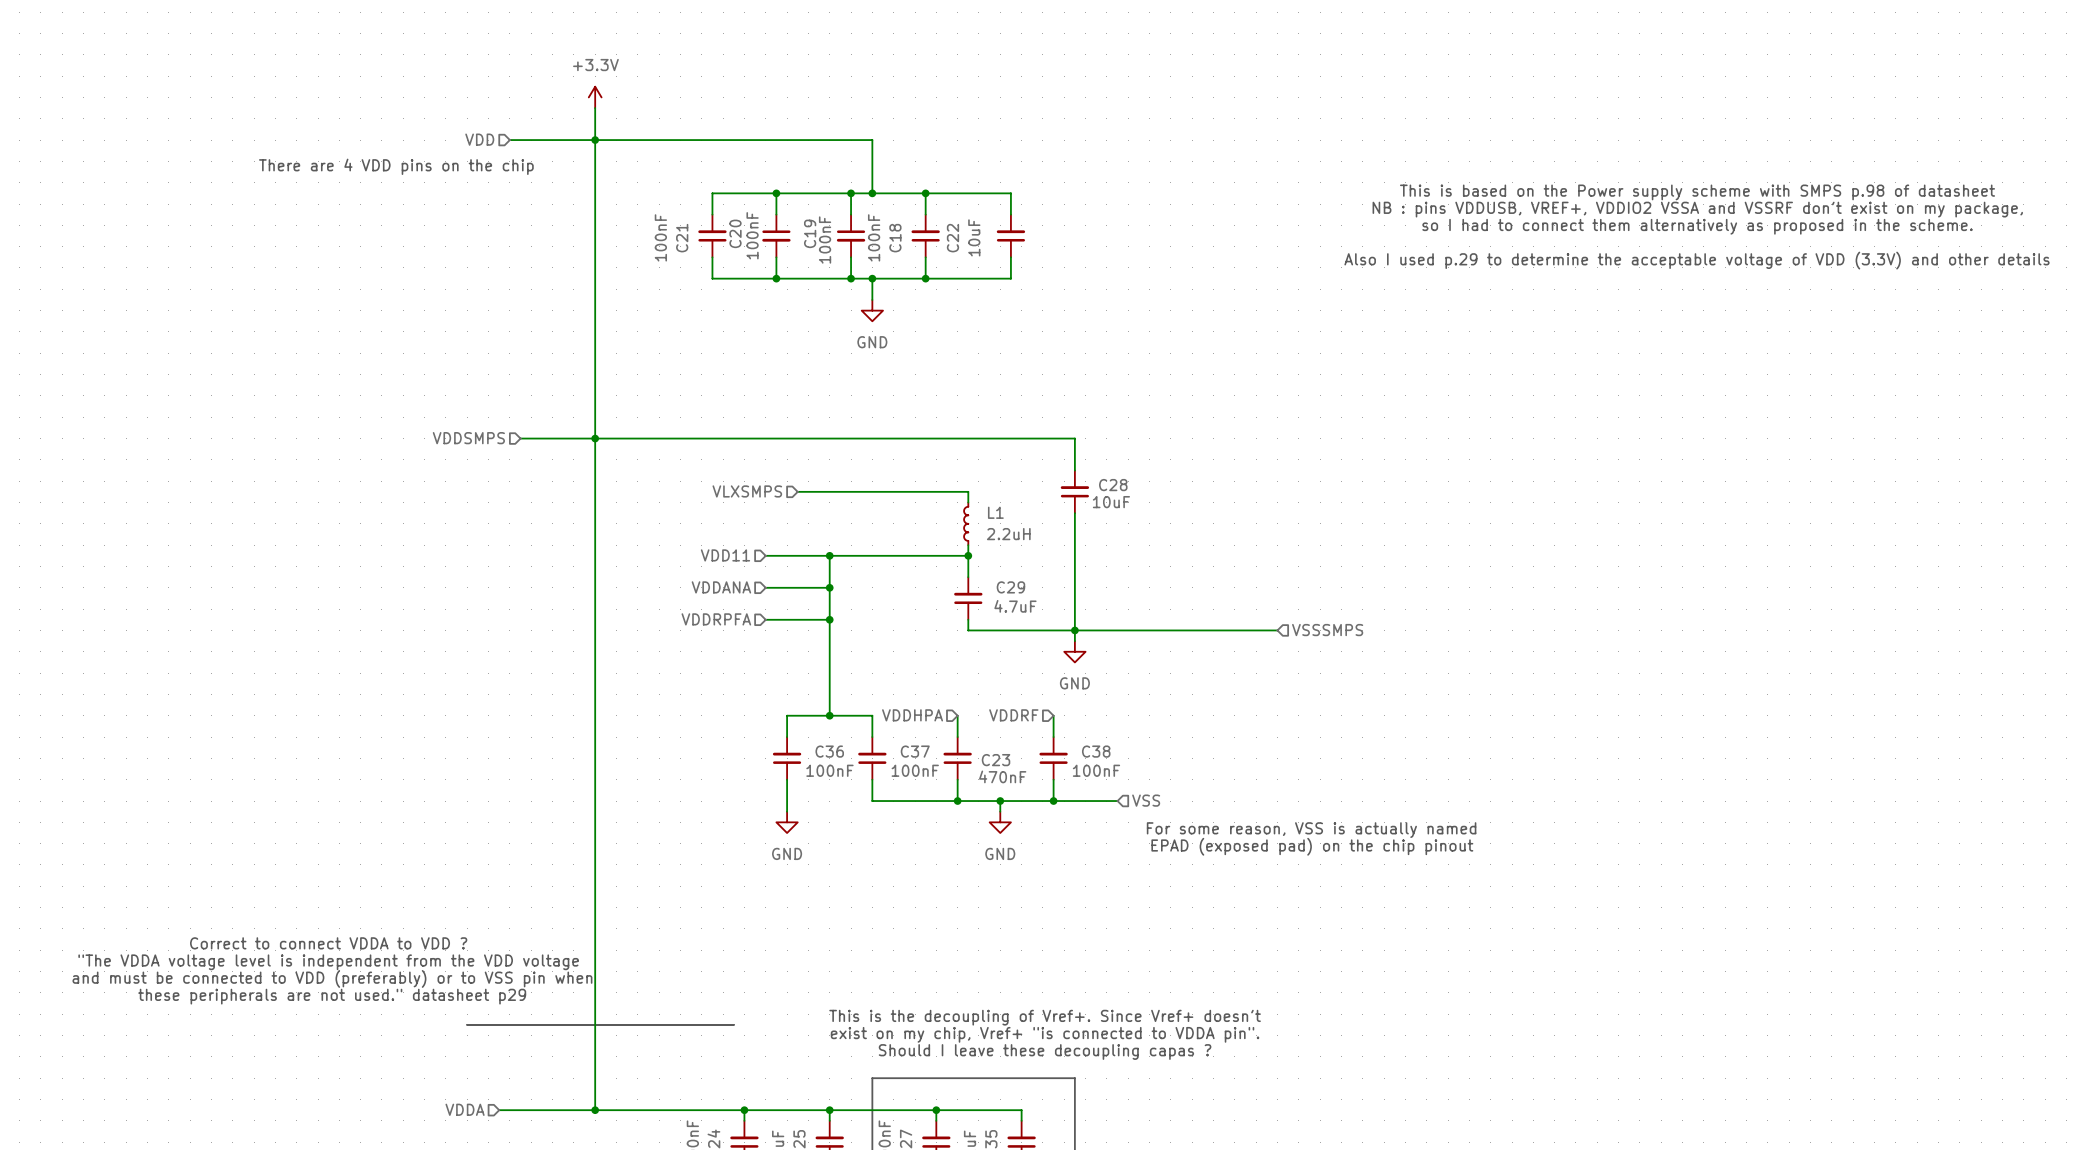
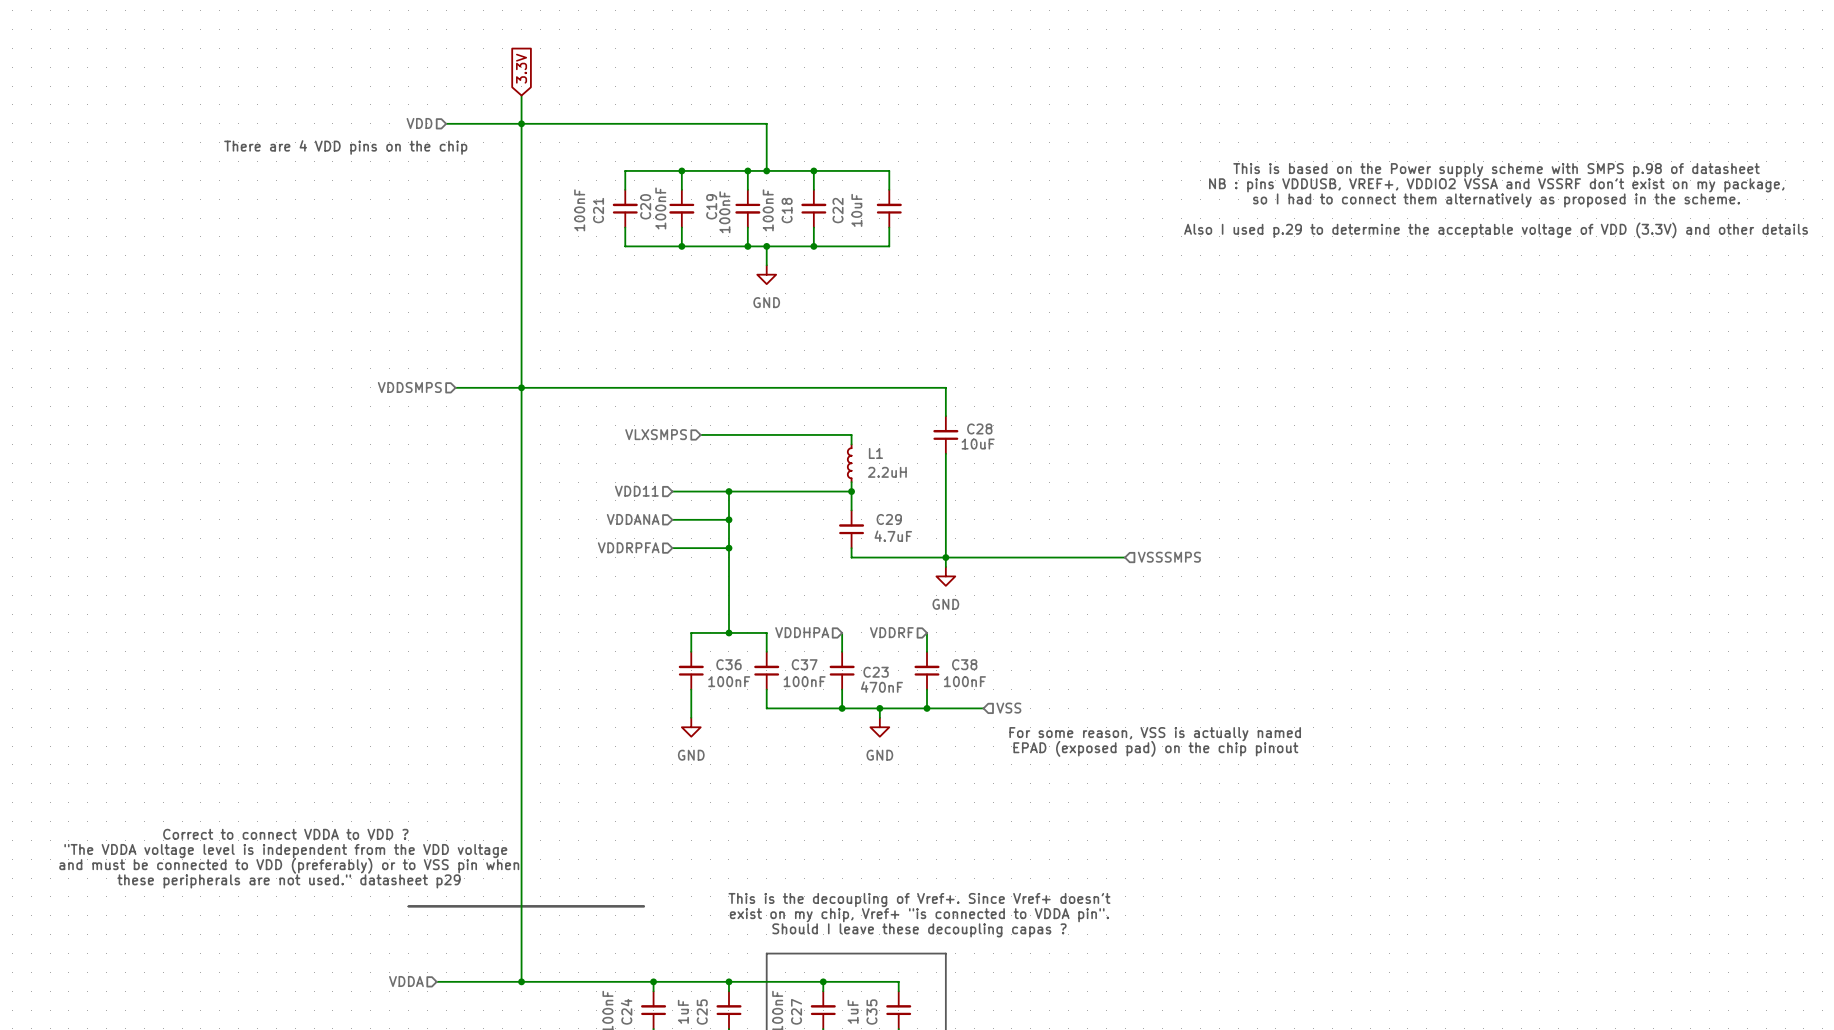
global label: none -> 3.3V (521, 68)
power symbol: +3.3V (595, 97) -> none

